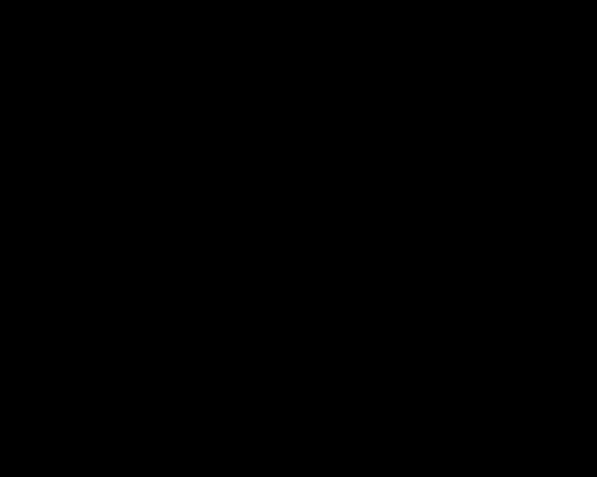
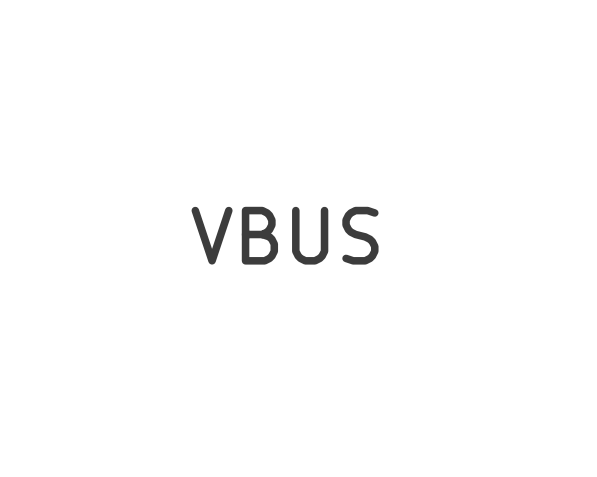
text: none -> VBUS (285, 235)

